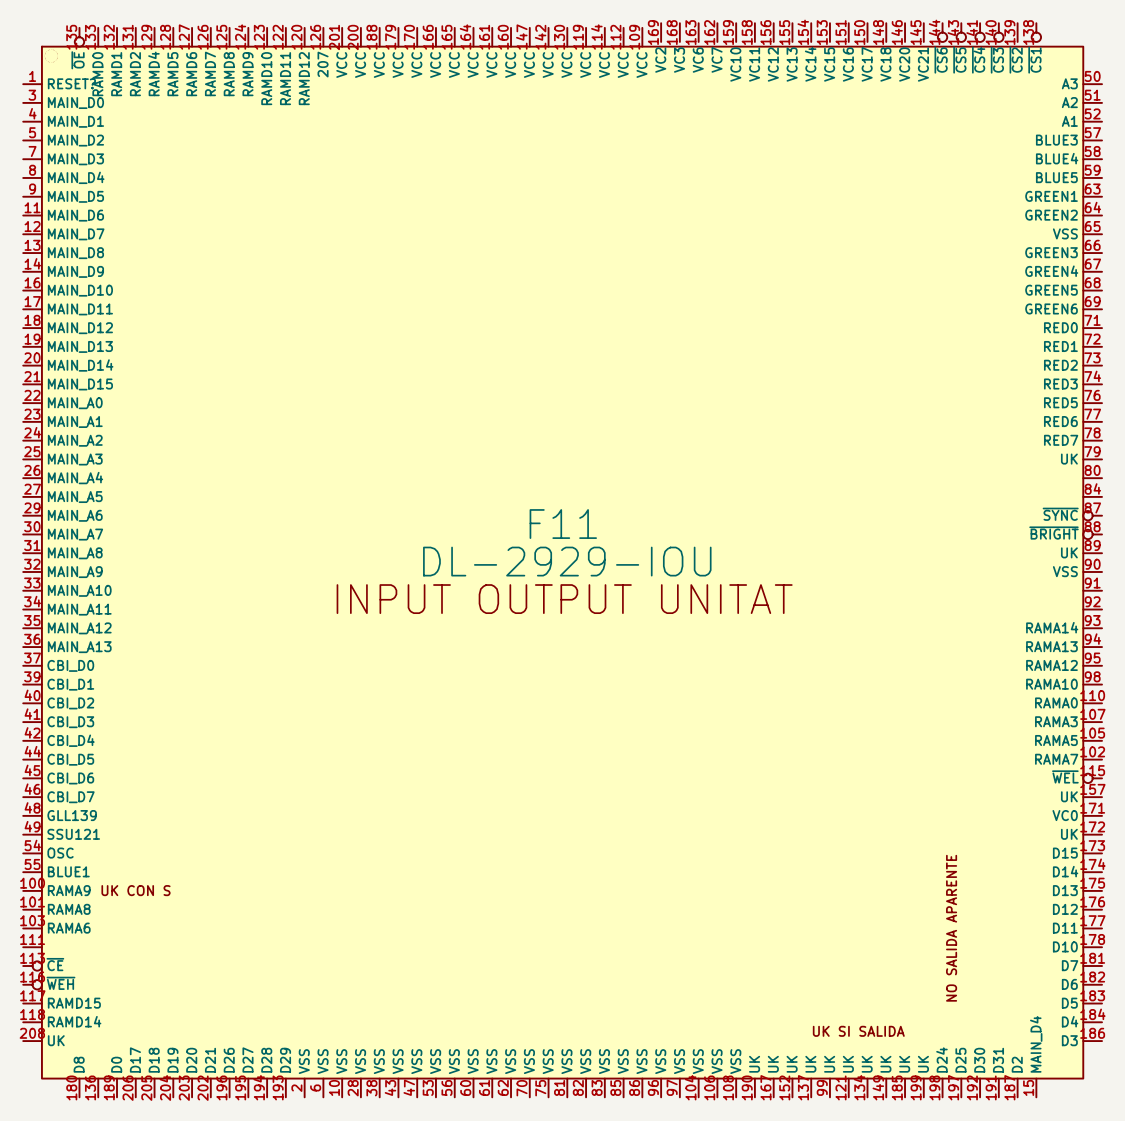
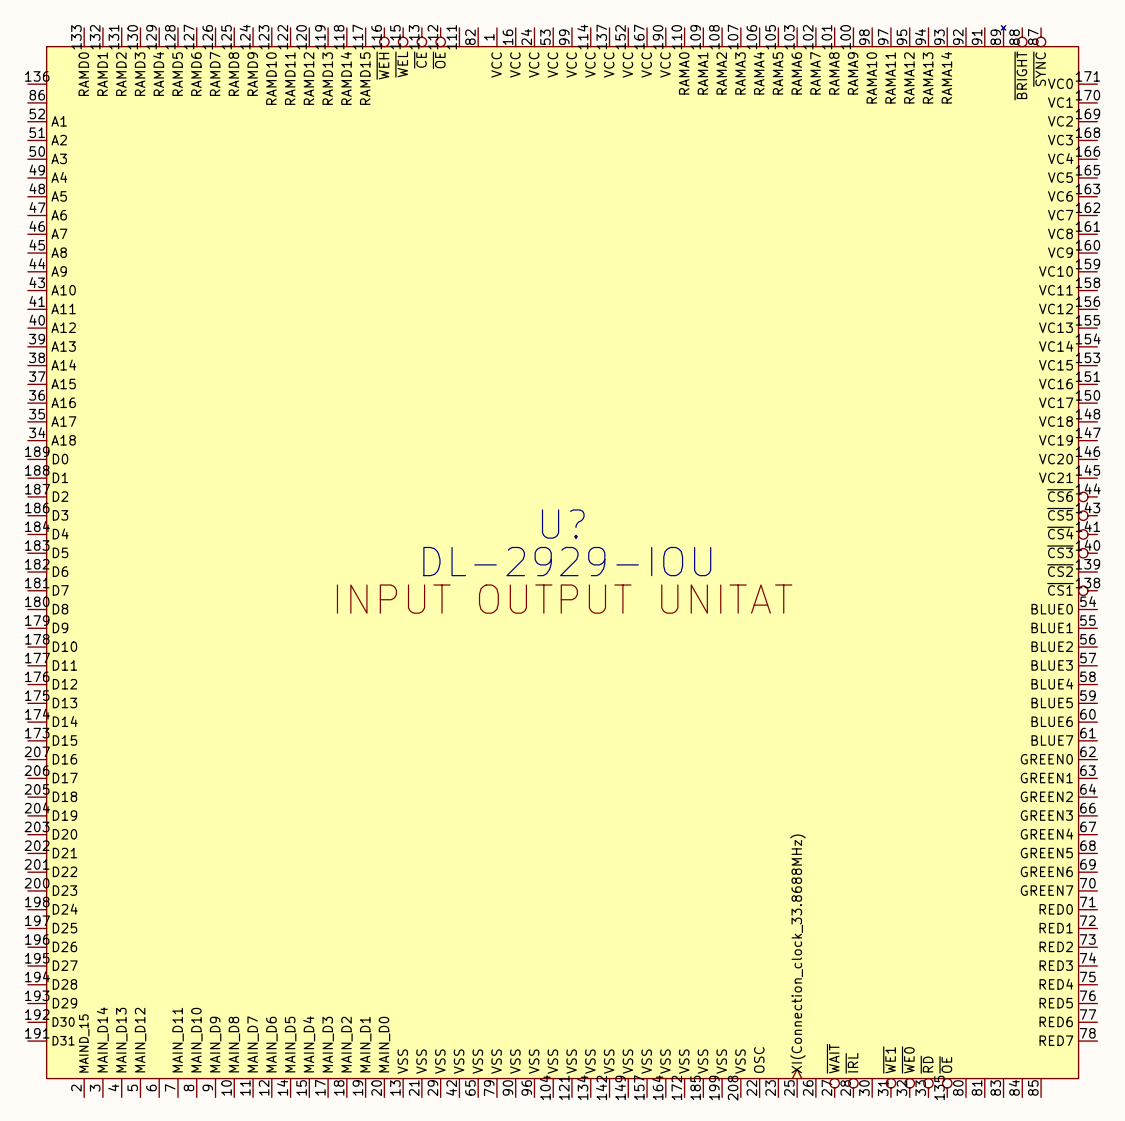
F11: DL-2929-IOU (562, 560) -> none
U?: none -> DL-2929-IOU (562, 561)

